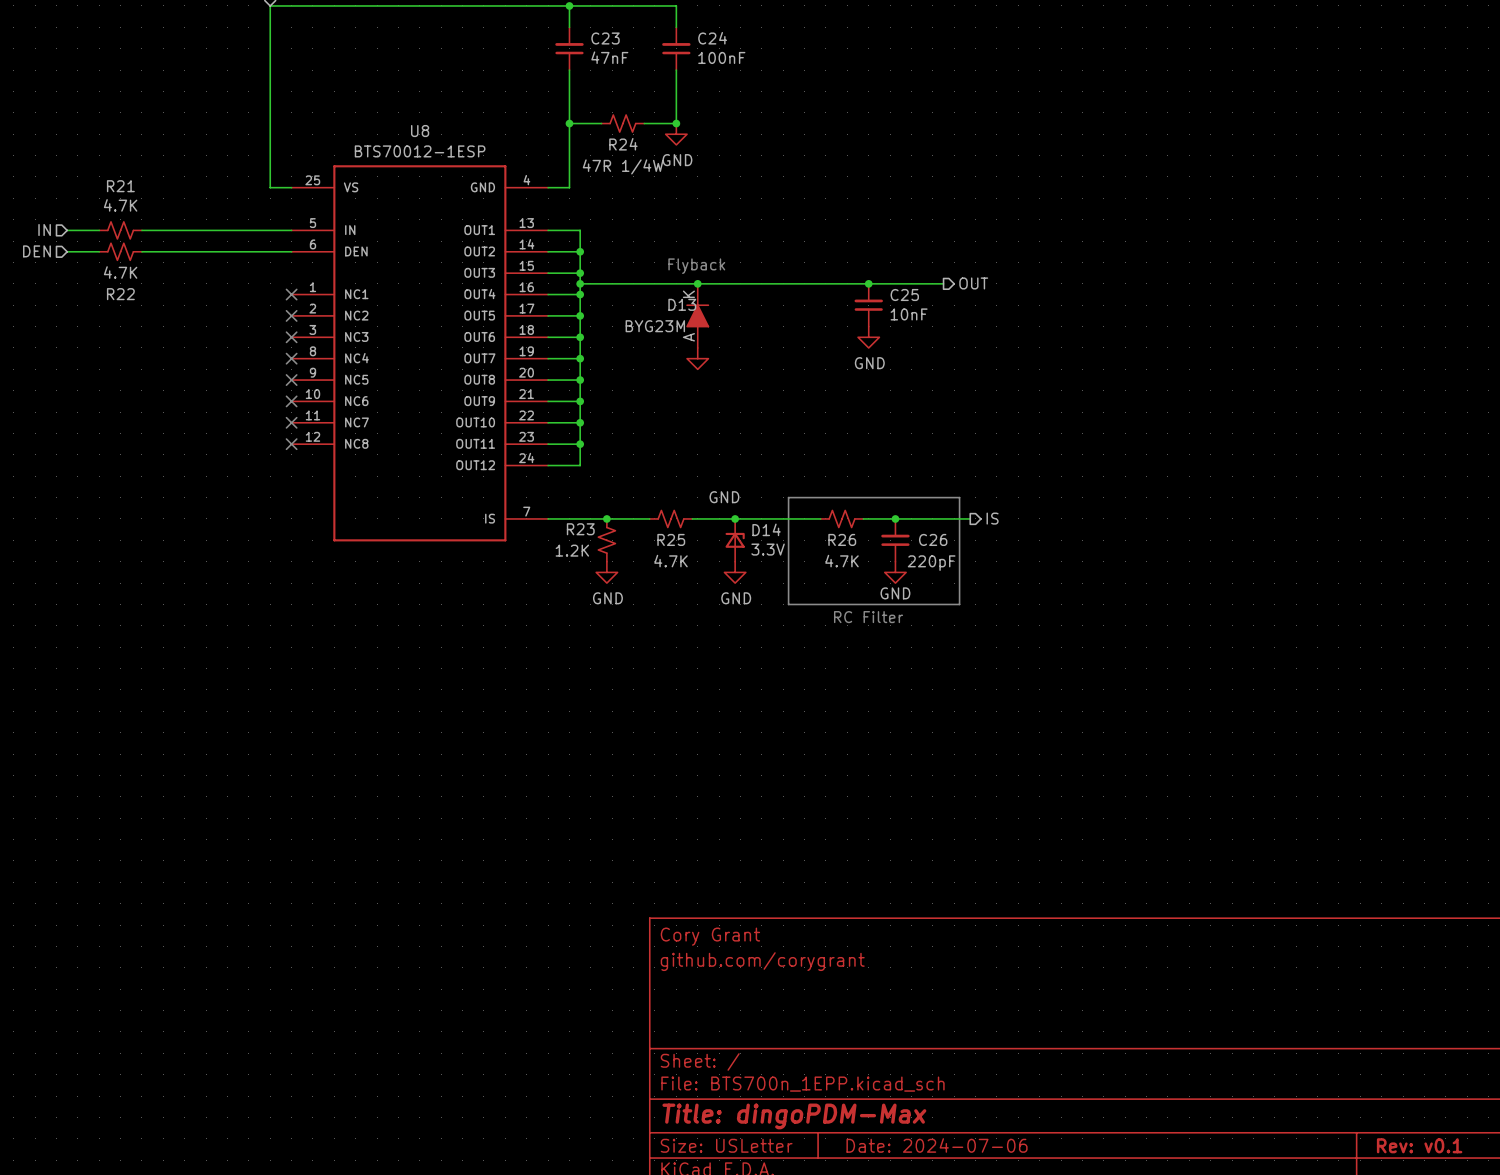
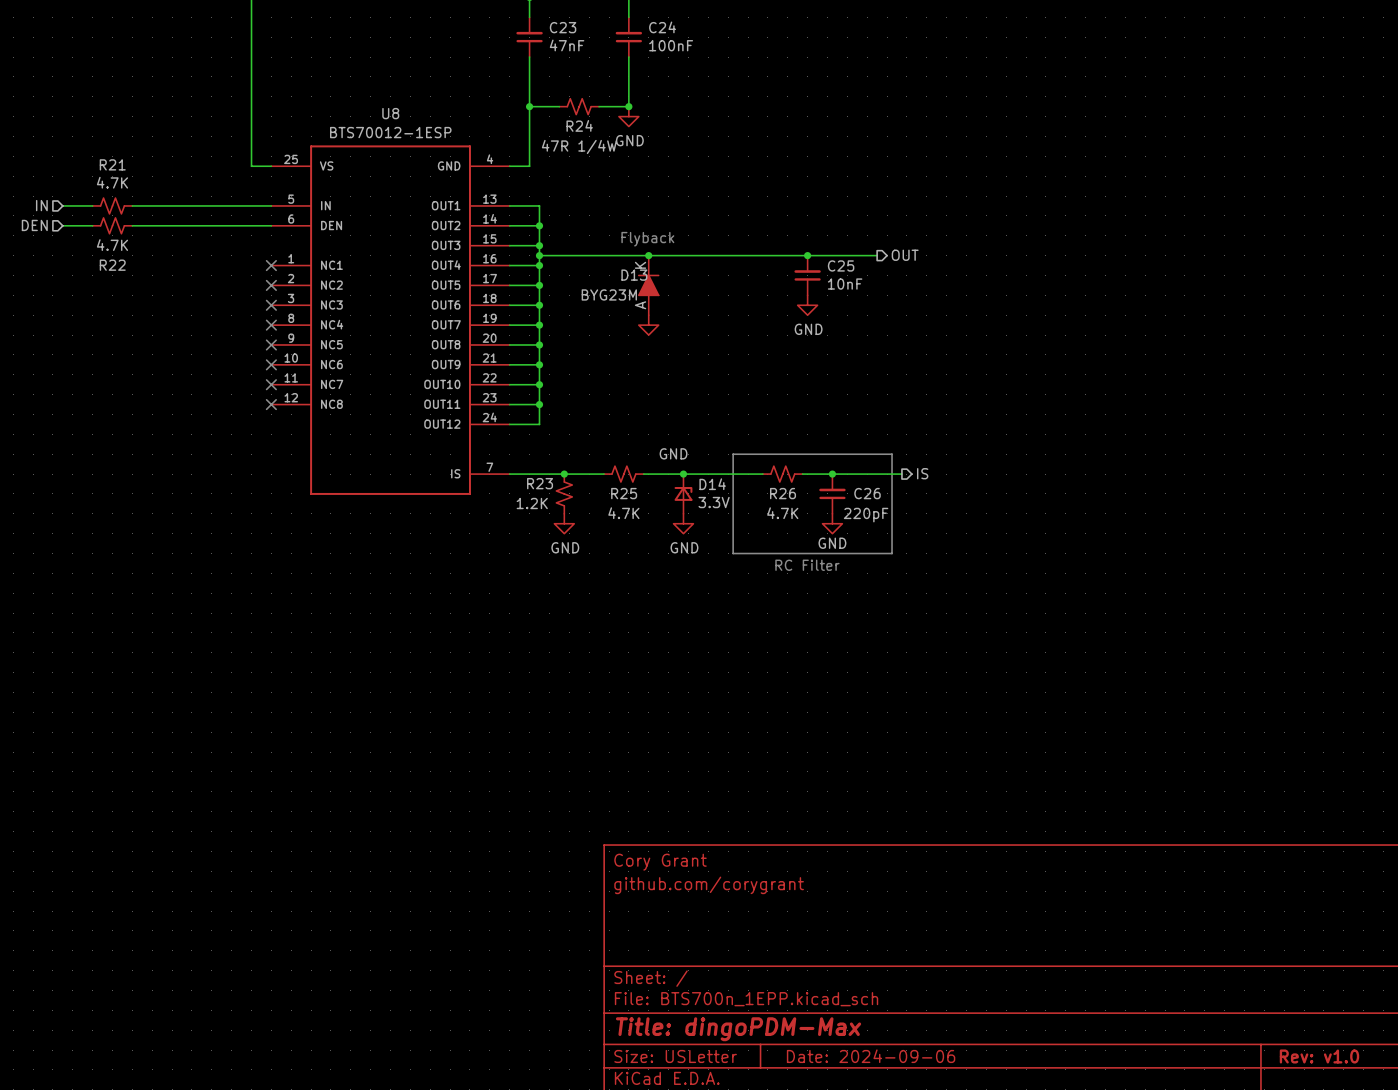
title block: Date: 2024-07-06 (937, 1145) -> Date: 2024-09-06 (871, 1056)
title block: Rev: v0.1 (1419, 1145) -> Rev: v1.0 (1319, 1056)

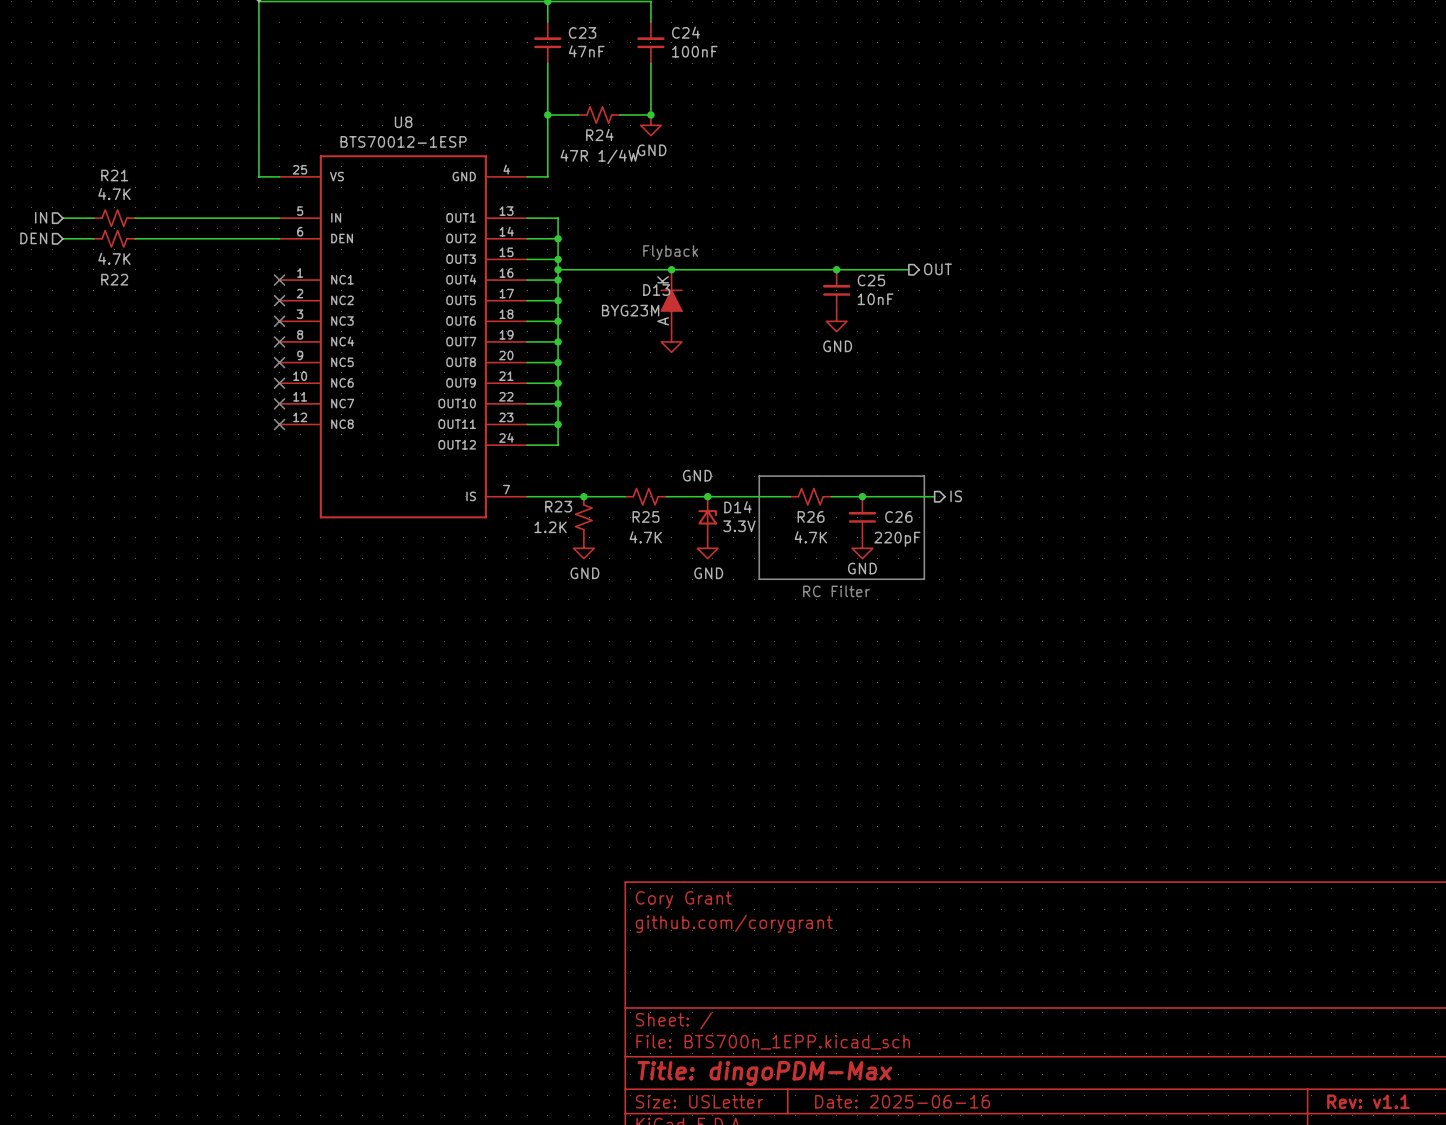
title block: Date: 2024-09-06 (871, 1056) -> Date: 2025-06-16 (902, 1101)
title block: Rev: v1.0 (1319, 1056) -> Rev: v1.1 (1368, 1101)

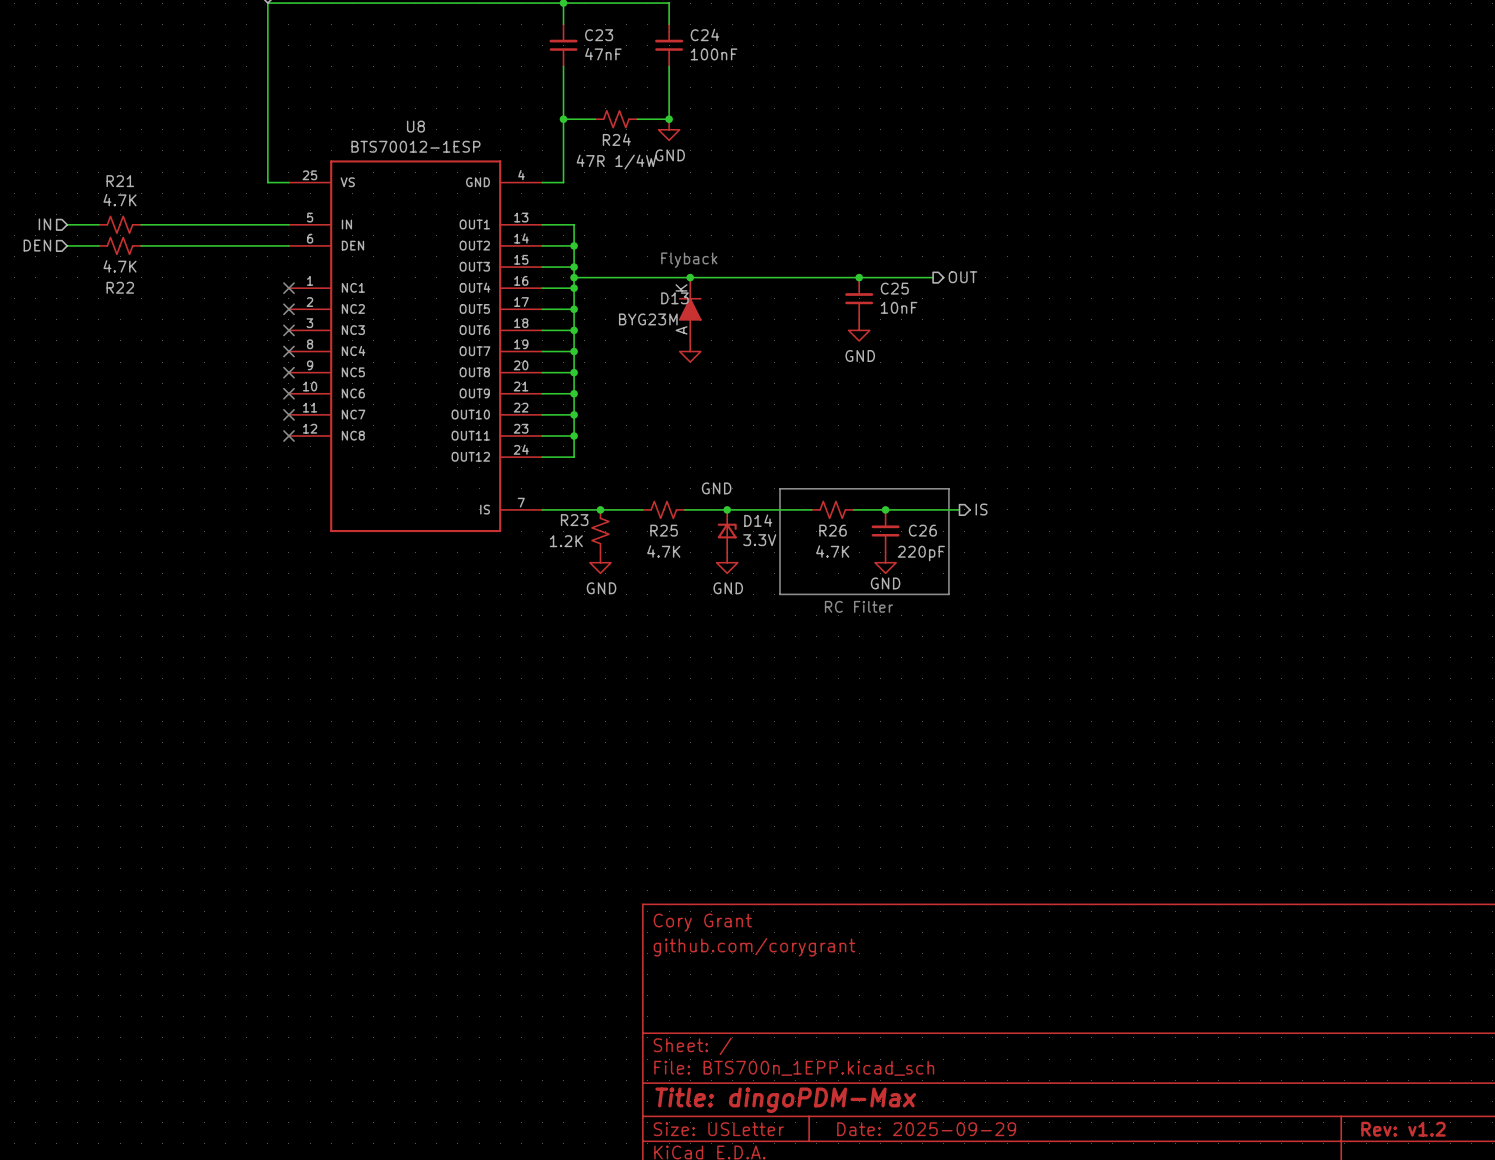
title block: Date: 2025-06-16 (902, 1101) -> Date: 2025-09-29 (926, 1129)
title block: Rev: v1.1 (1368, 1101) -> Rev: v1.2 (1403, 1129)

